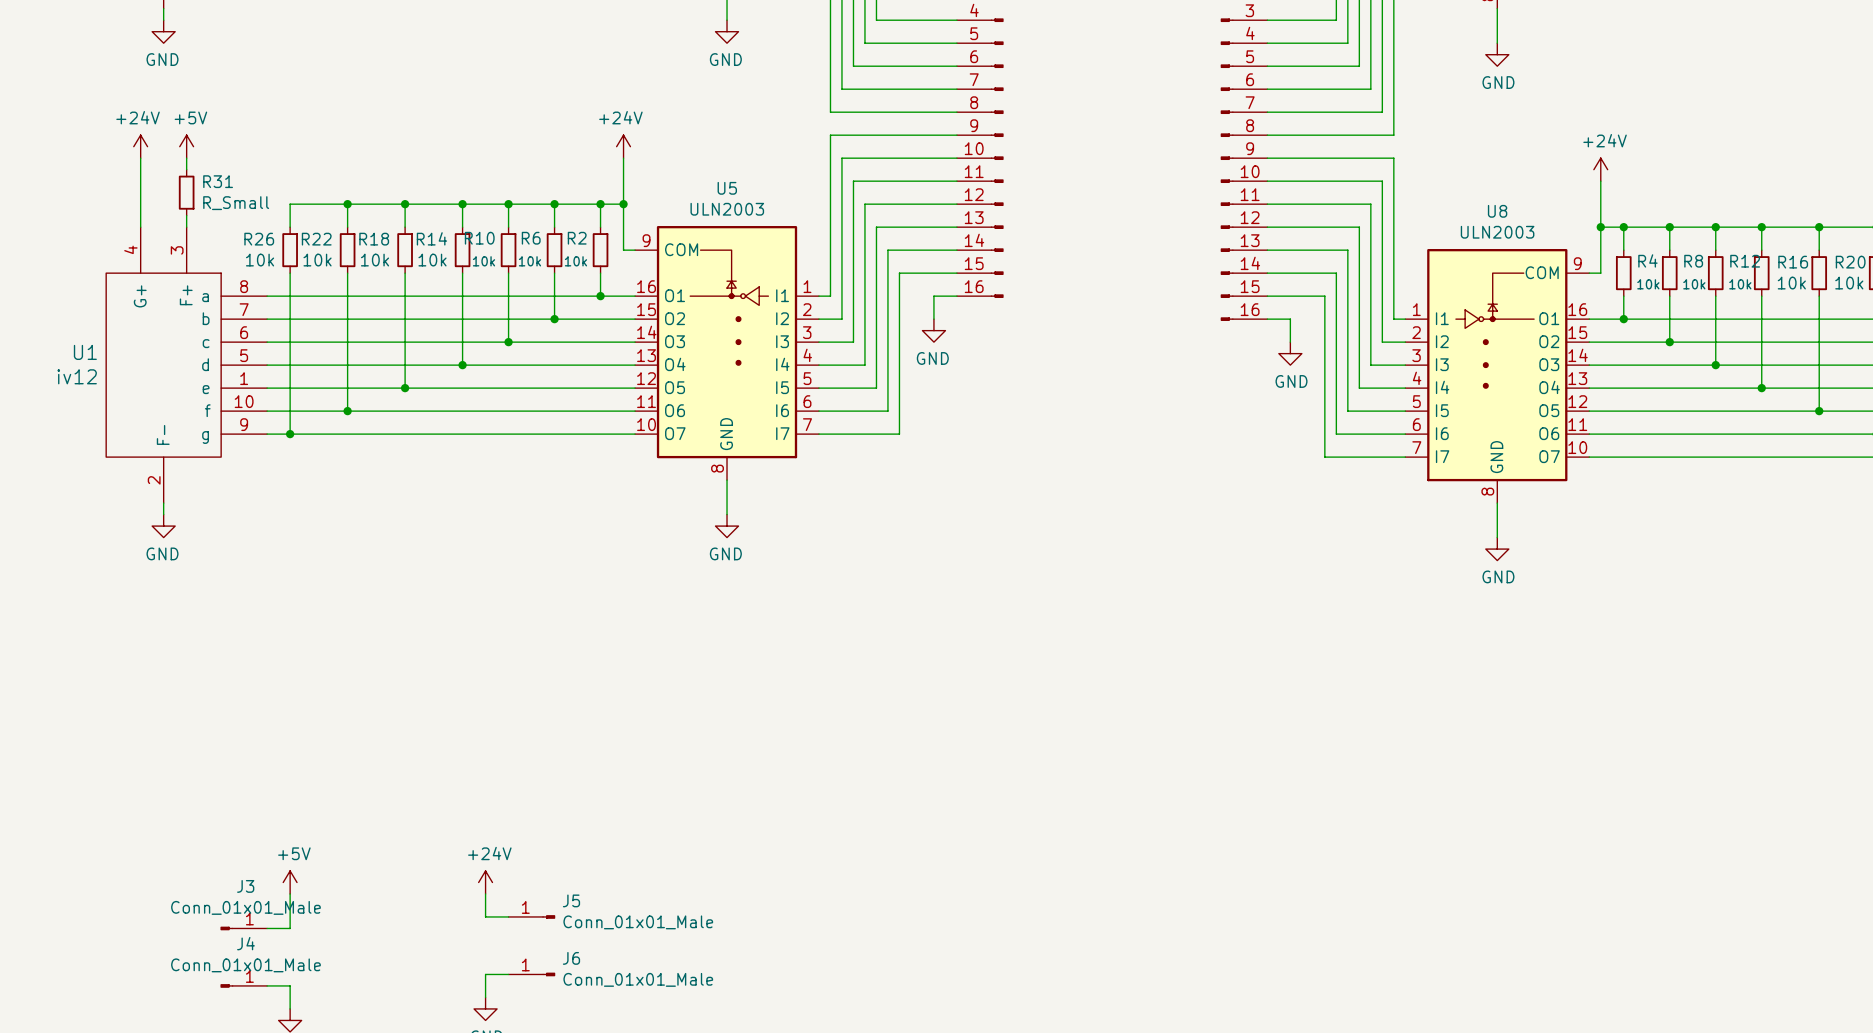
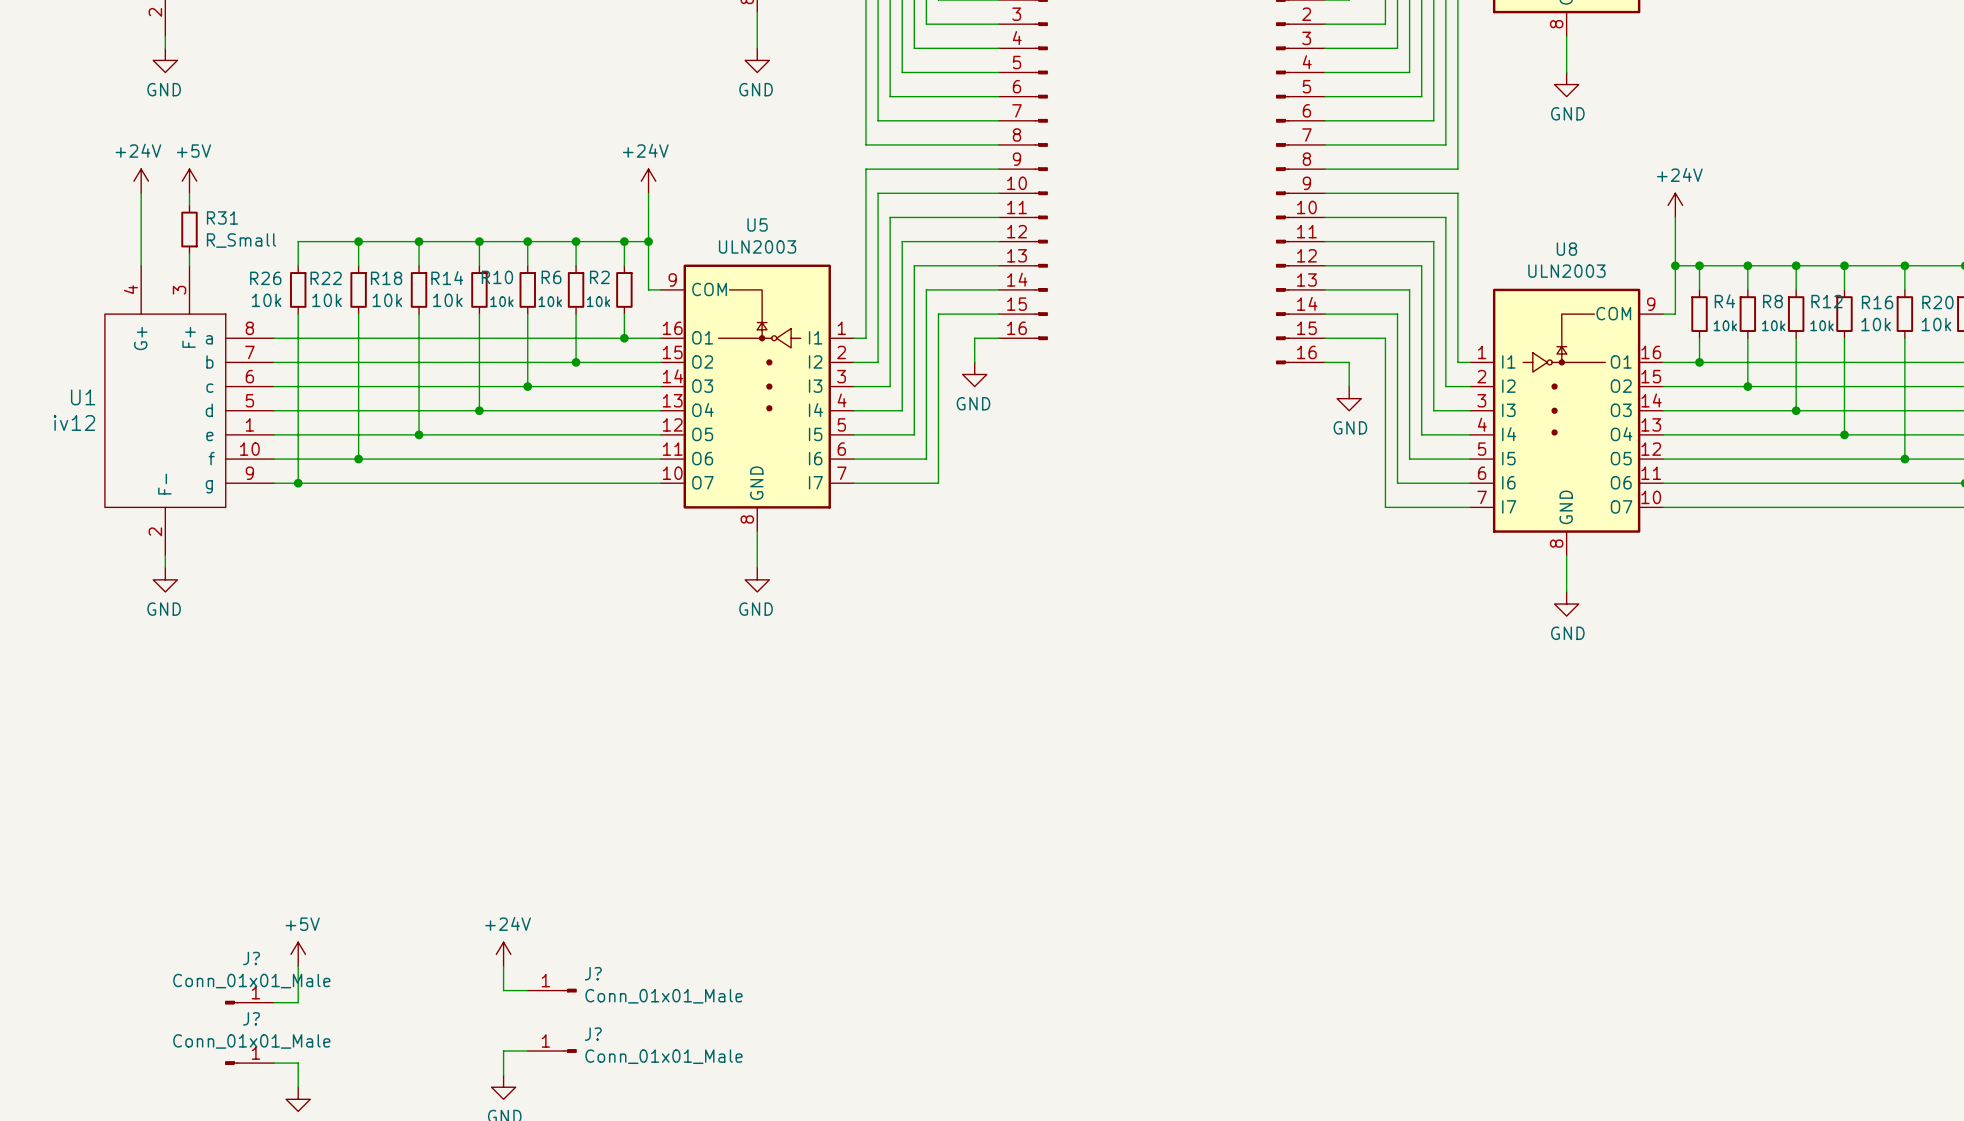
J3 name: J3 (245, 886) -> J? (251, 958)
J5 name: J5 (571, 900) -> J? (593, 973)
J4 name: J4 (245, 943) -> J? (251, 1018)
J6 name: J6 (571, 958) -> J? (593, 1034)

